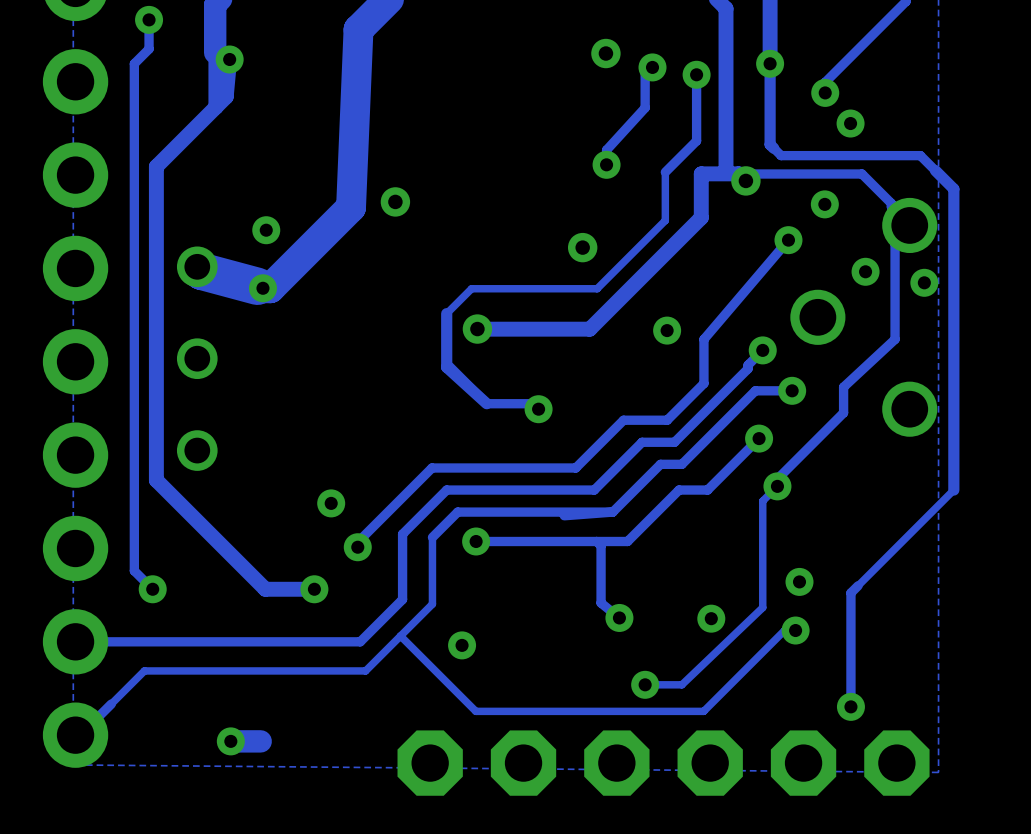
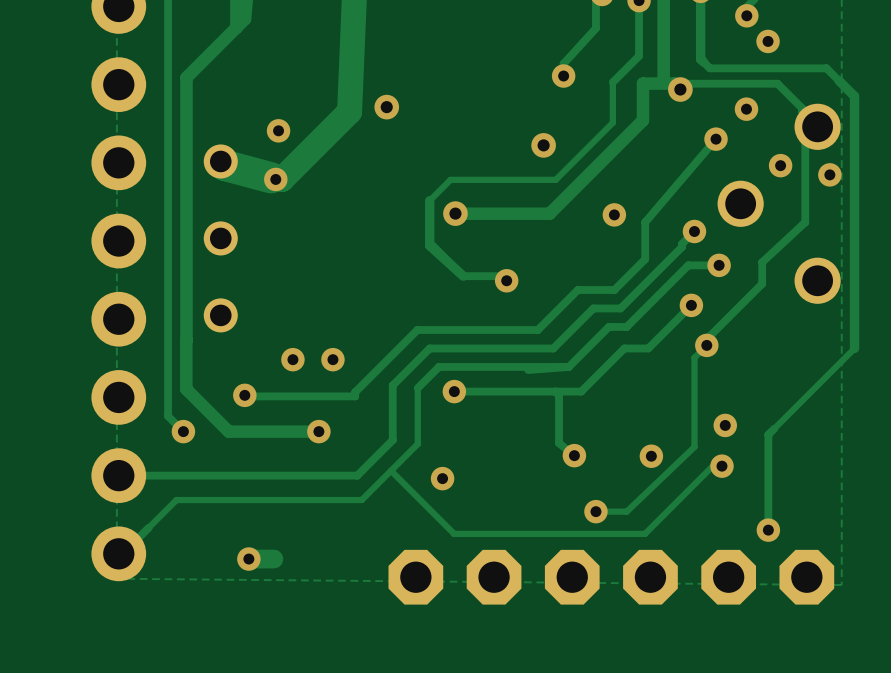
track: (156, 480) (265, 589) -> (186, 340) (186, 389) (228, 431) (277, 431)
via: none -> (292, 359)
track: none -> (244, 395) (355, 396)
via: none -> (244, 395)
via: (357, 547) -> none

